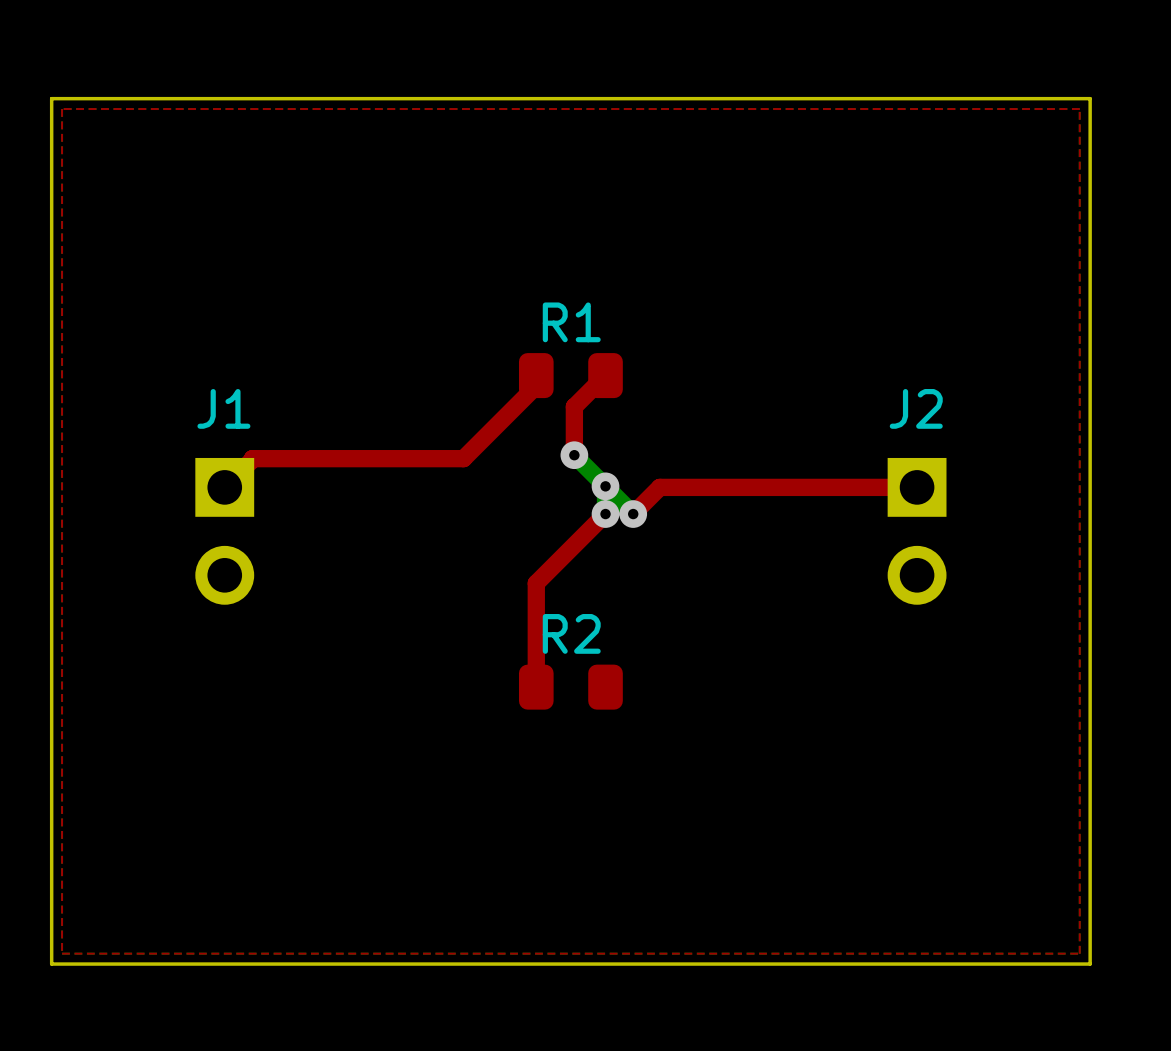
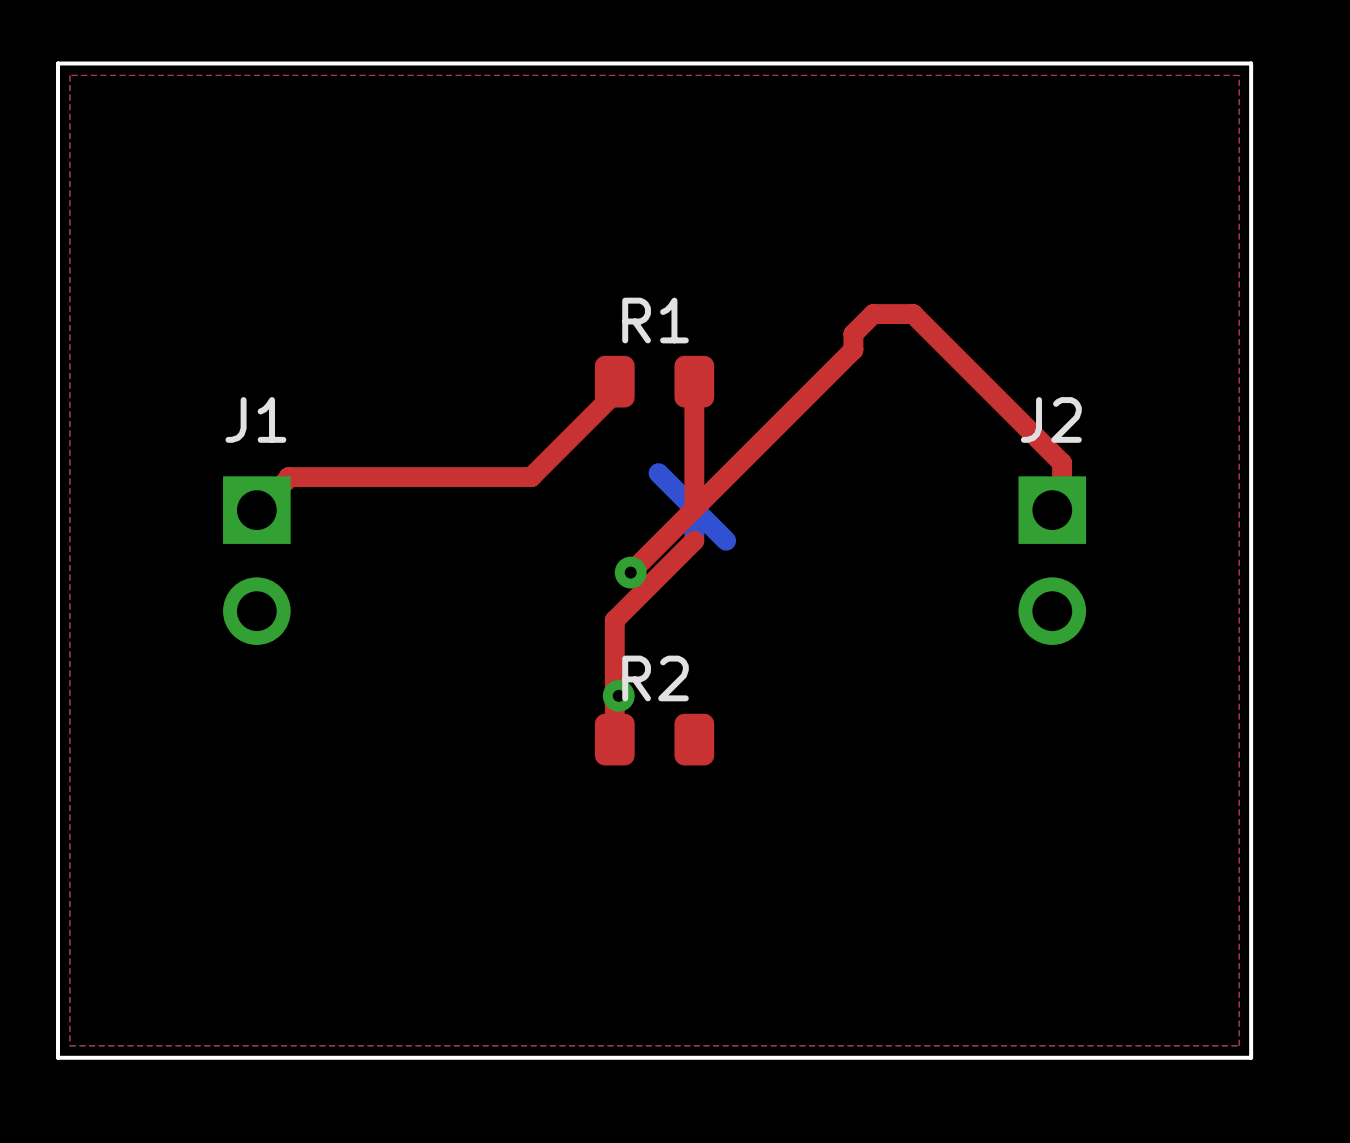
top track: (605, 375) (574, 406) (574, 455) -> (694, 381) (694, 508)
via: (574, 455) -> none
via: (605, 486) -> none
top track: (917, 487) (659, 487) (633, 514) -> (1052, 510) (1052, 500) (1062, 491) (1062, 463) (913, 314) (873, 314) (853, 333) (853, 349) (630, 572)
via: (605, 514) -> none
via: (633, 514) -> none
via: none -> (630, 572)
via: none -> (618, 695)

